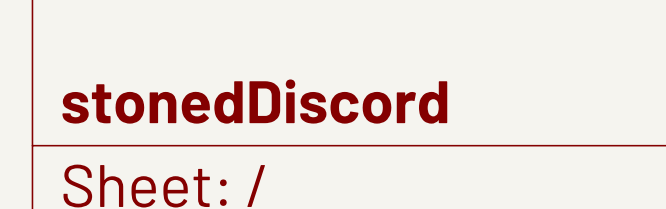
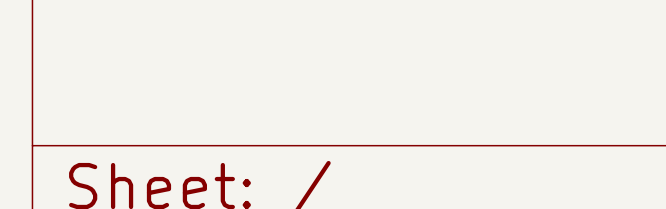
title block: stonedDiscord (254, 101) -> none

